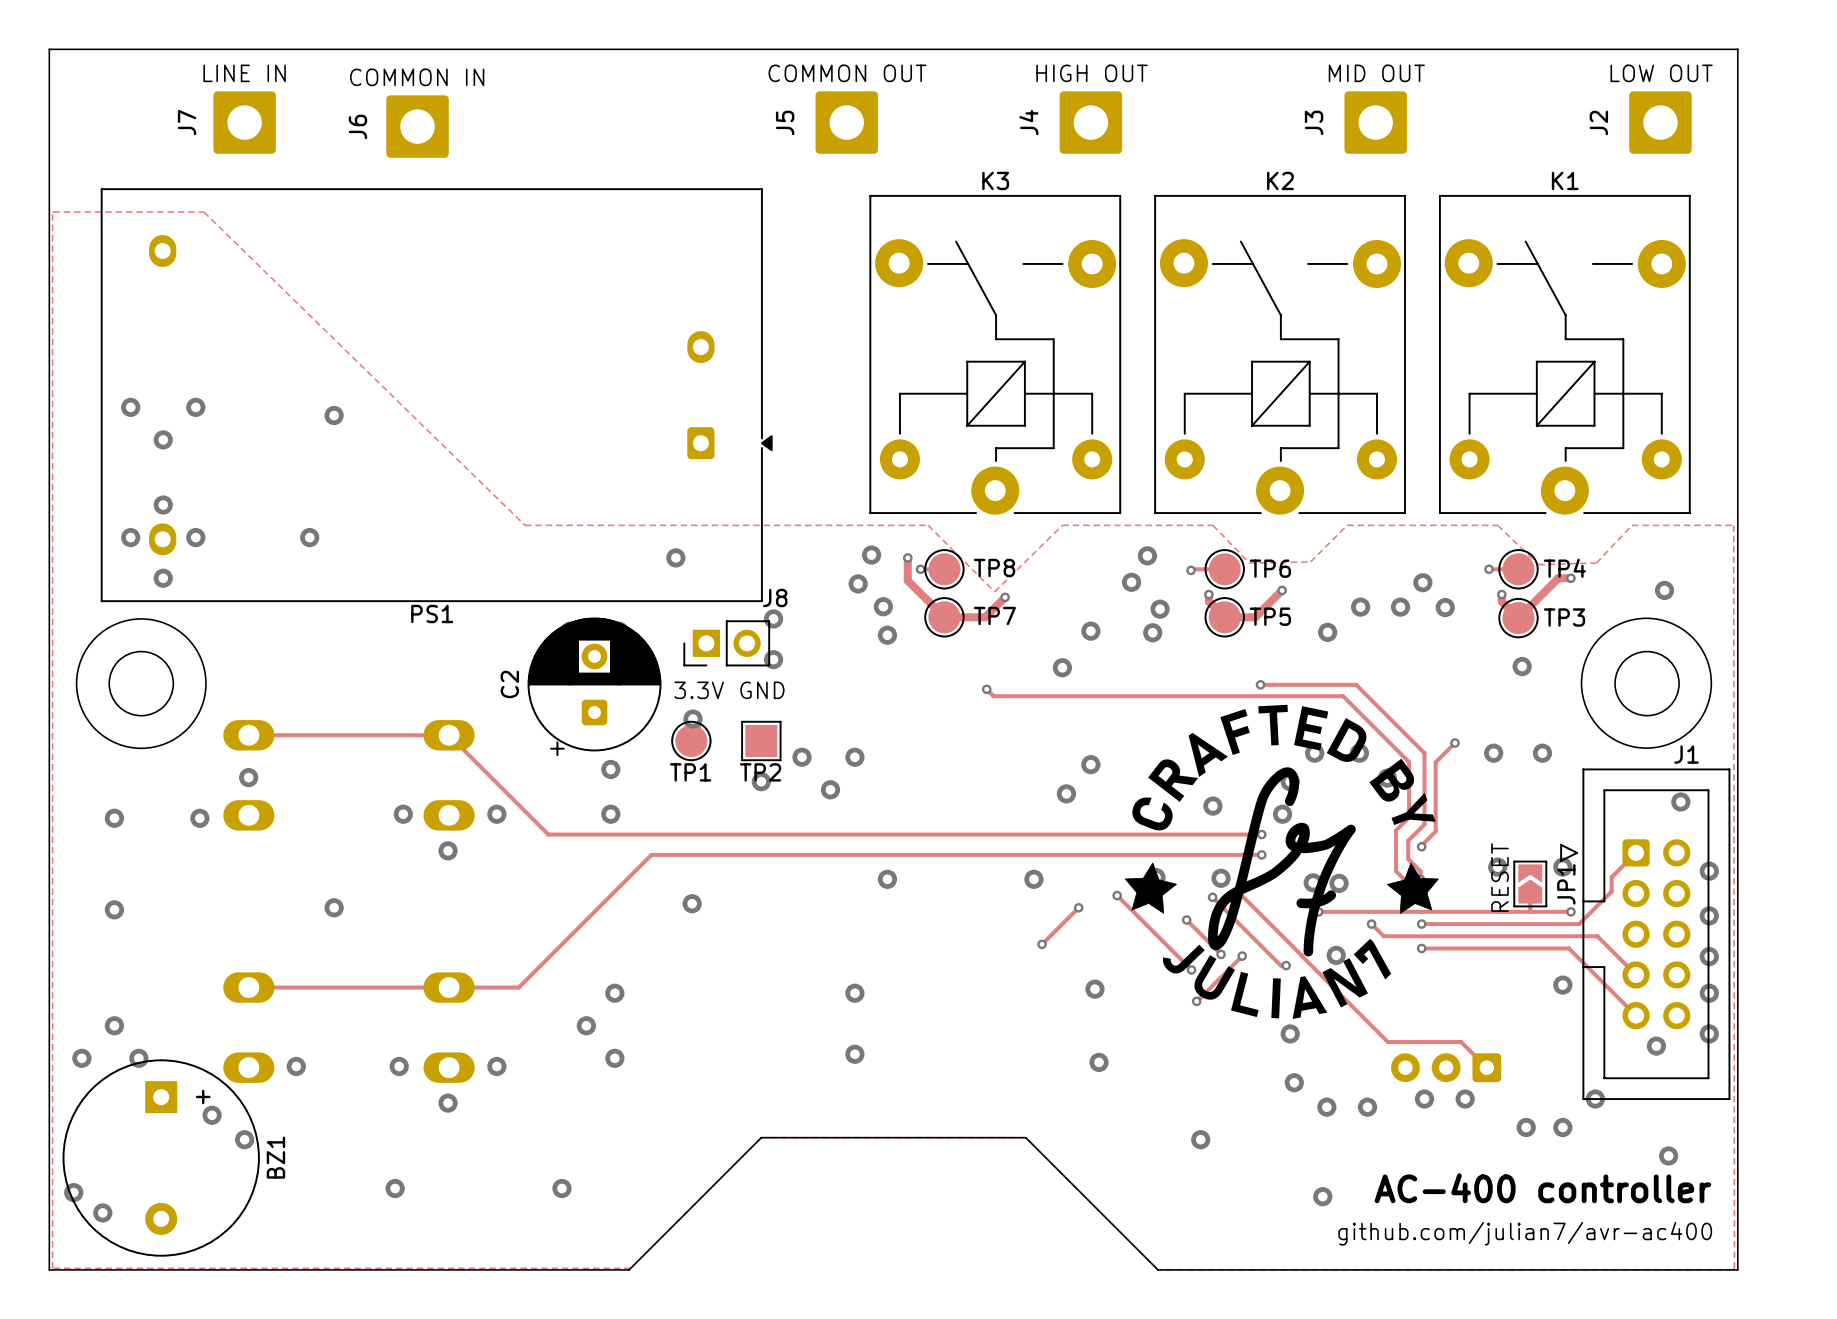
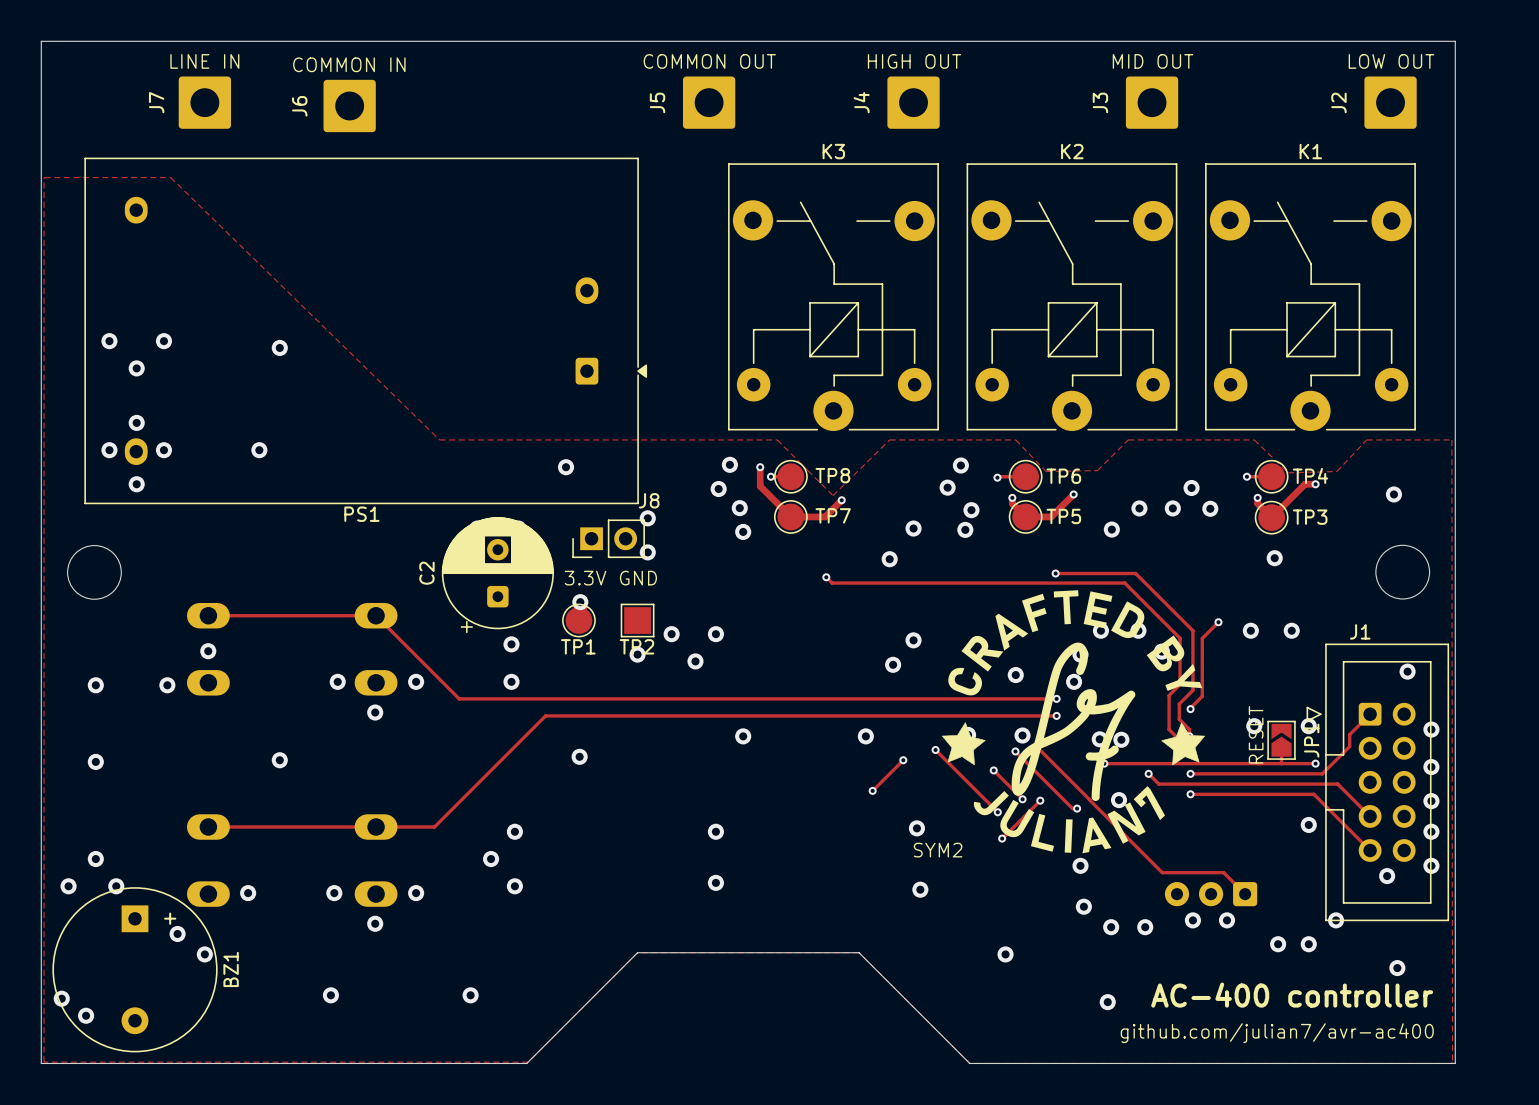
drawing shape: [48, 48, 1739, 1271] -> [40, 40, 1456, 1064]
drawing: [1580, 617, 1713, 749] -> none
drawing: [75, 618, 207, 750] -> none
J1 name position: J1 (1686, 754) -> J1 (1360, 631)
SYM2: none -> (1073, 721)

